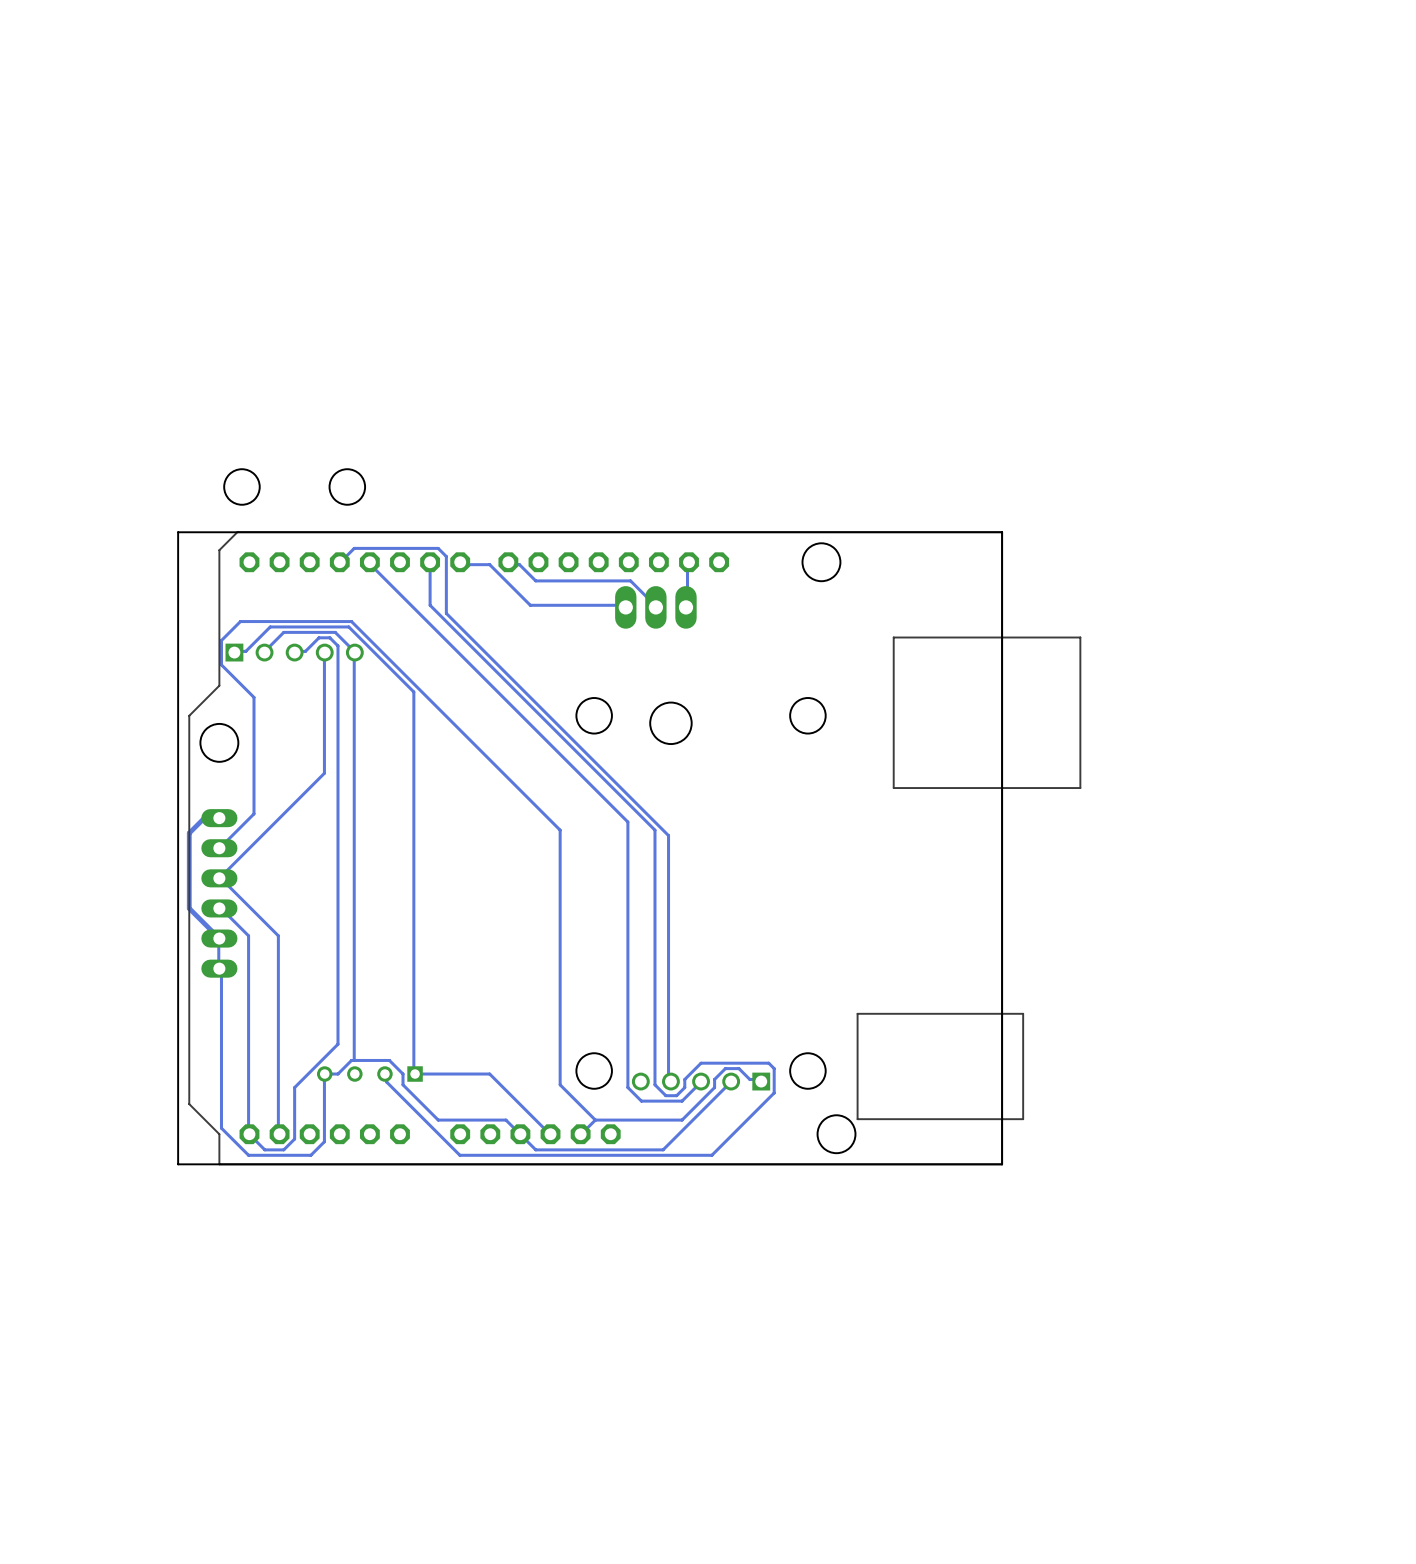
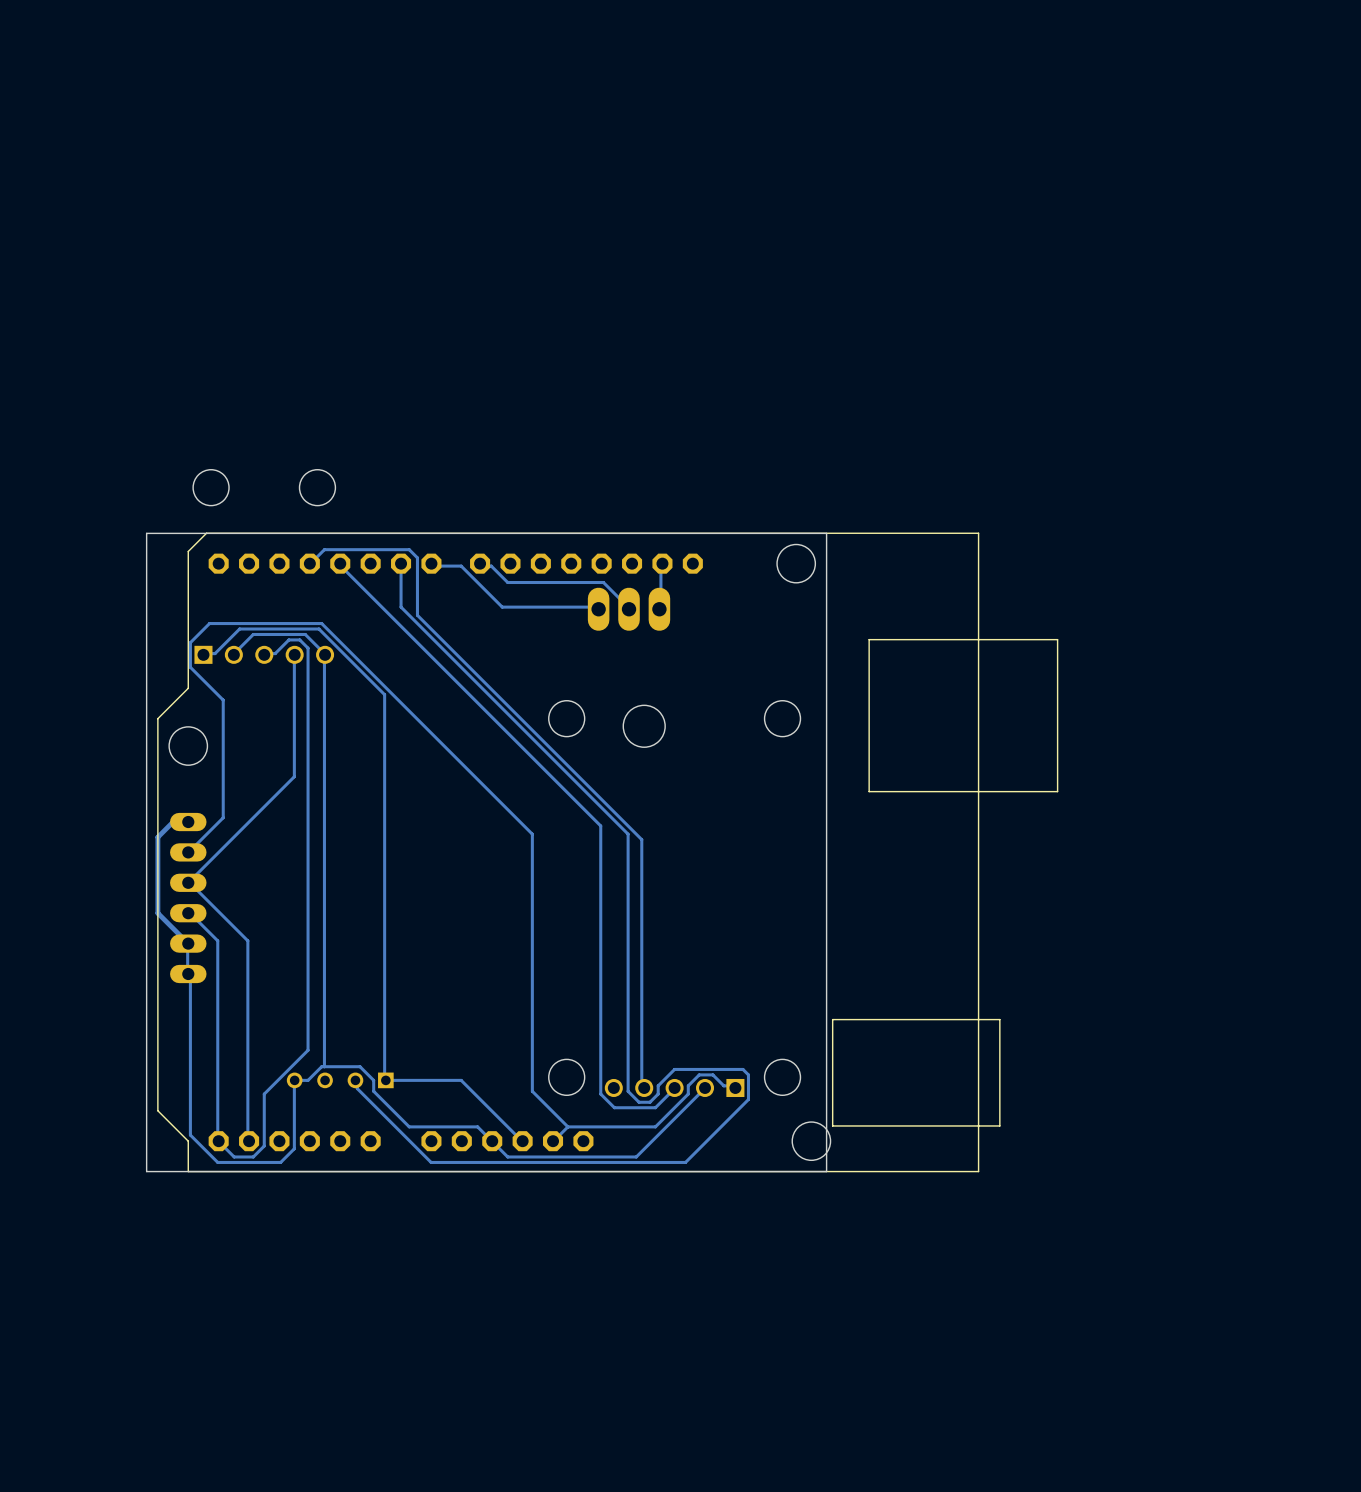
board edge: (851, 532) (1002, 532) (1002, 1164) (851, 1164) -> (826, 533) (826, 1171)

